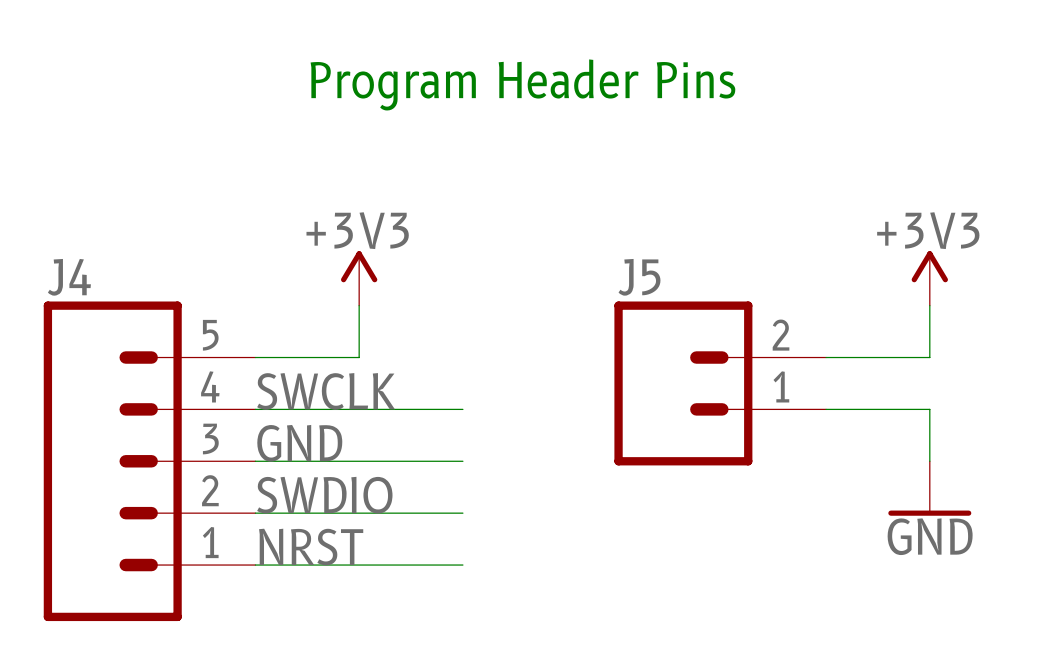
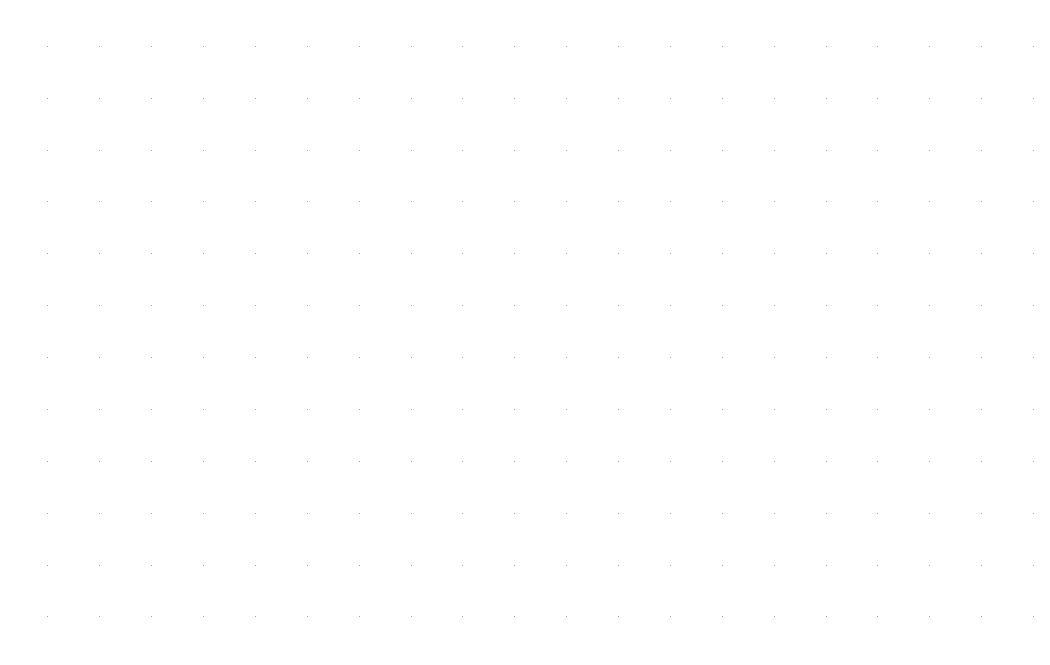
text: Program Header Pins (522, 84) -> none
power symbol: +3V3 (359, 278) -> none
power symbol: +3V3 (929, 278) -> none
wire: (359, 305) (359, 357) (255, 357) -> none
wire: (929, 305) (929, 357) (826, 357) -> none
J5: (720, 383) -> none
label: SWCLK (326, 391) -> none
wire: (255, 409) (462, 409) -> none
wire: (826, 409) (929, 409) (929, 461) -> none
label: GND (299, 443) -> none
J4: (149, 461) -> none
wire: (255, 461) (462, 461) -> none
power symbol: GND (929, 488) -> none
label: SWDIO (324, 495) -> none
wire: (255, 513) (462, 513) -> none
label: NRST (311, 547) -> none
wire: (255, 565) (462, 565) -> none

